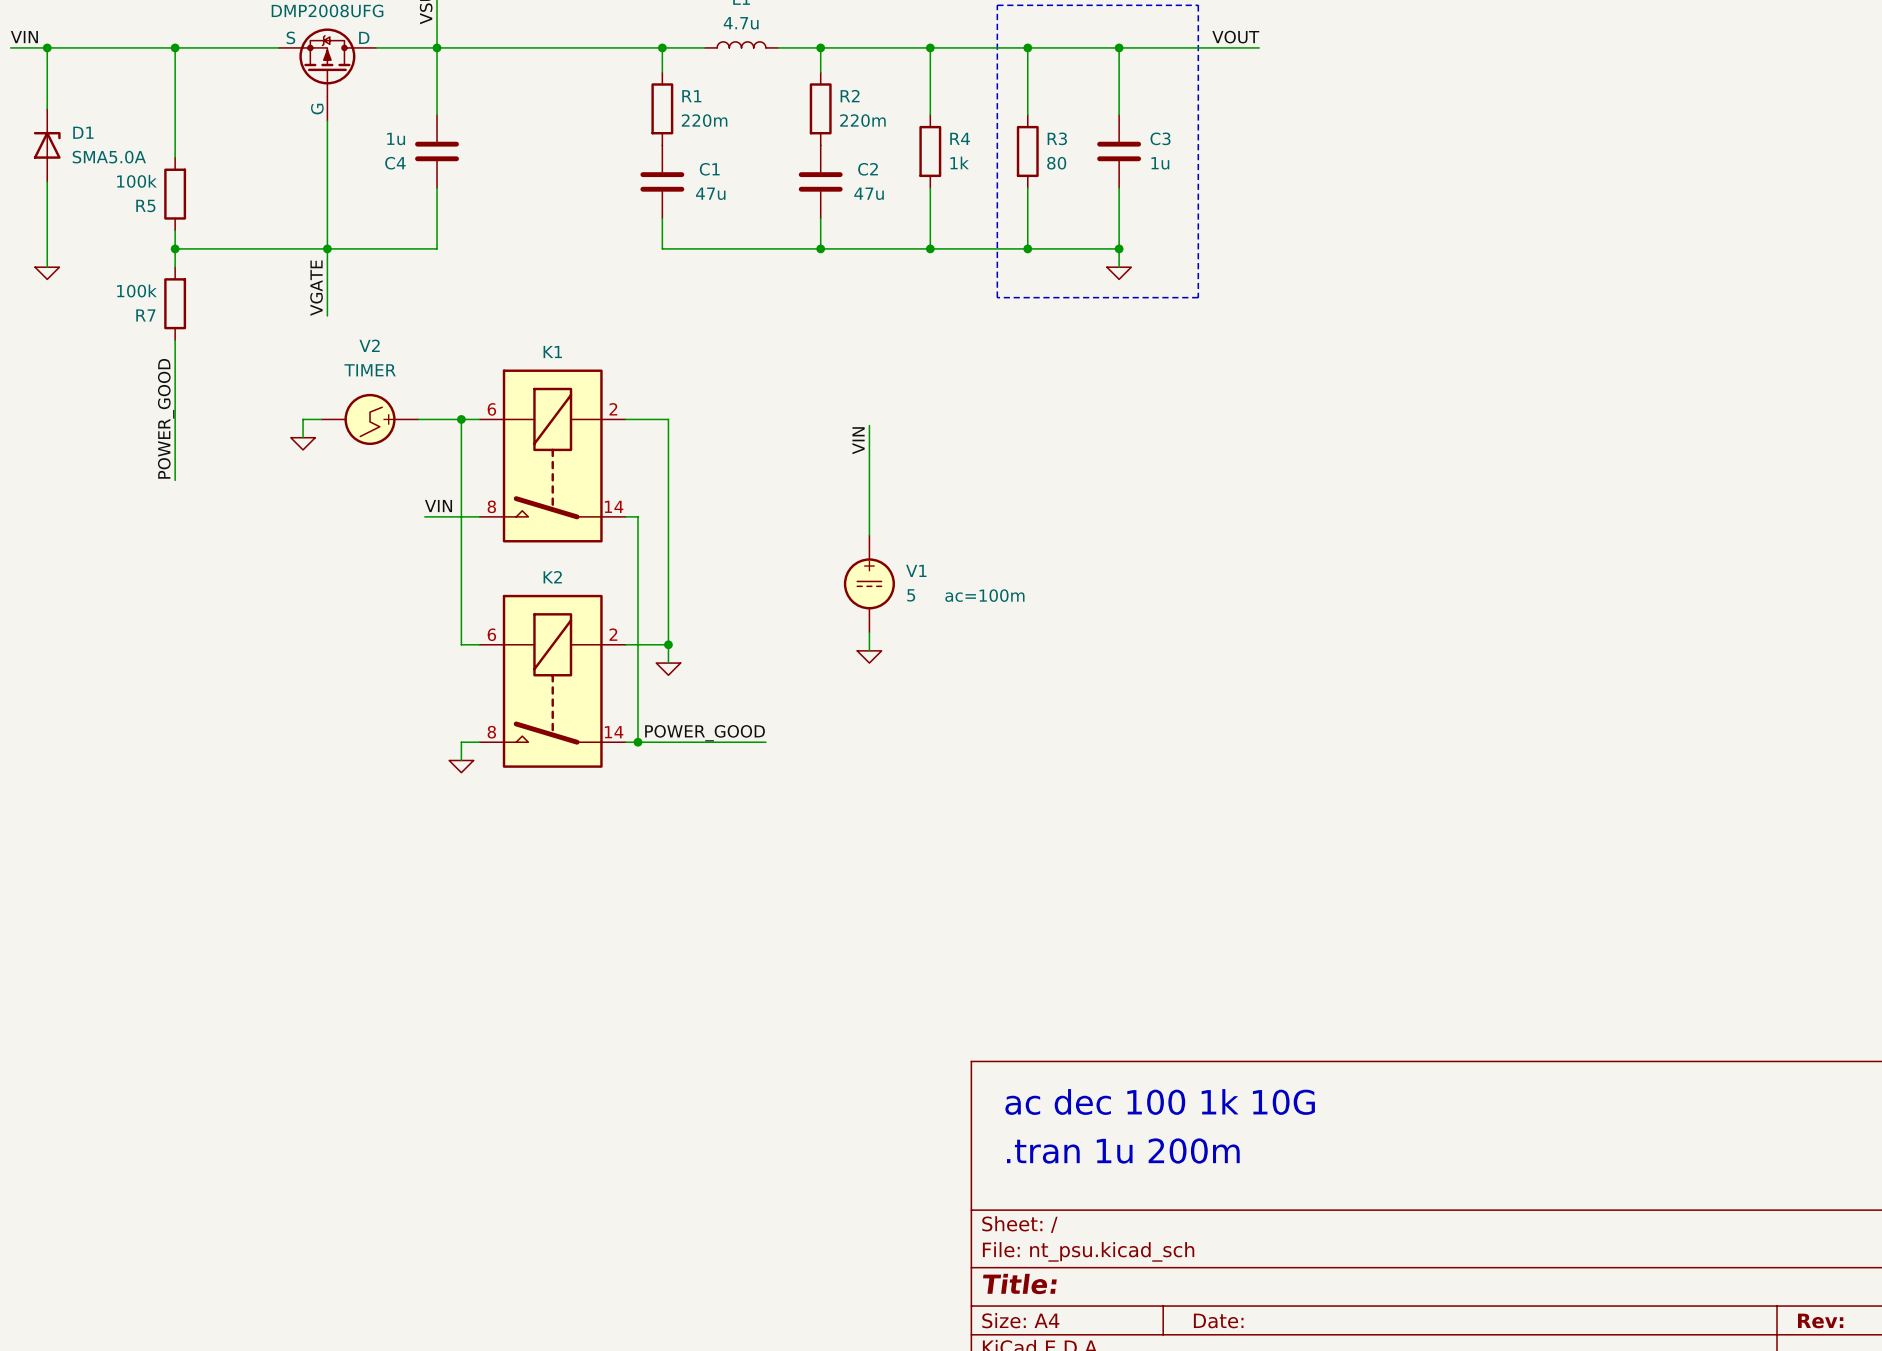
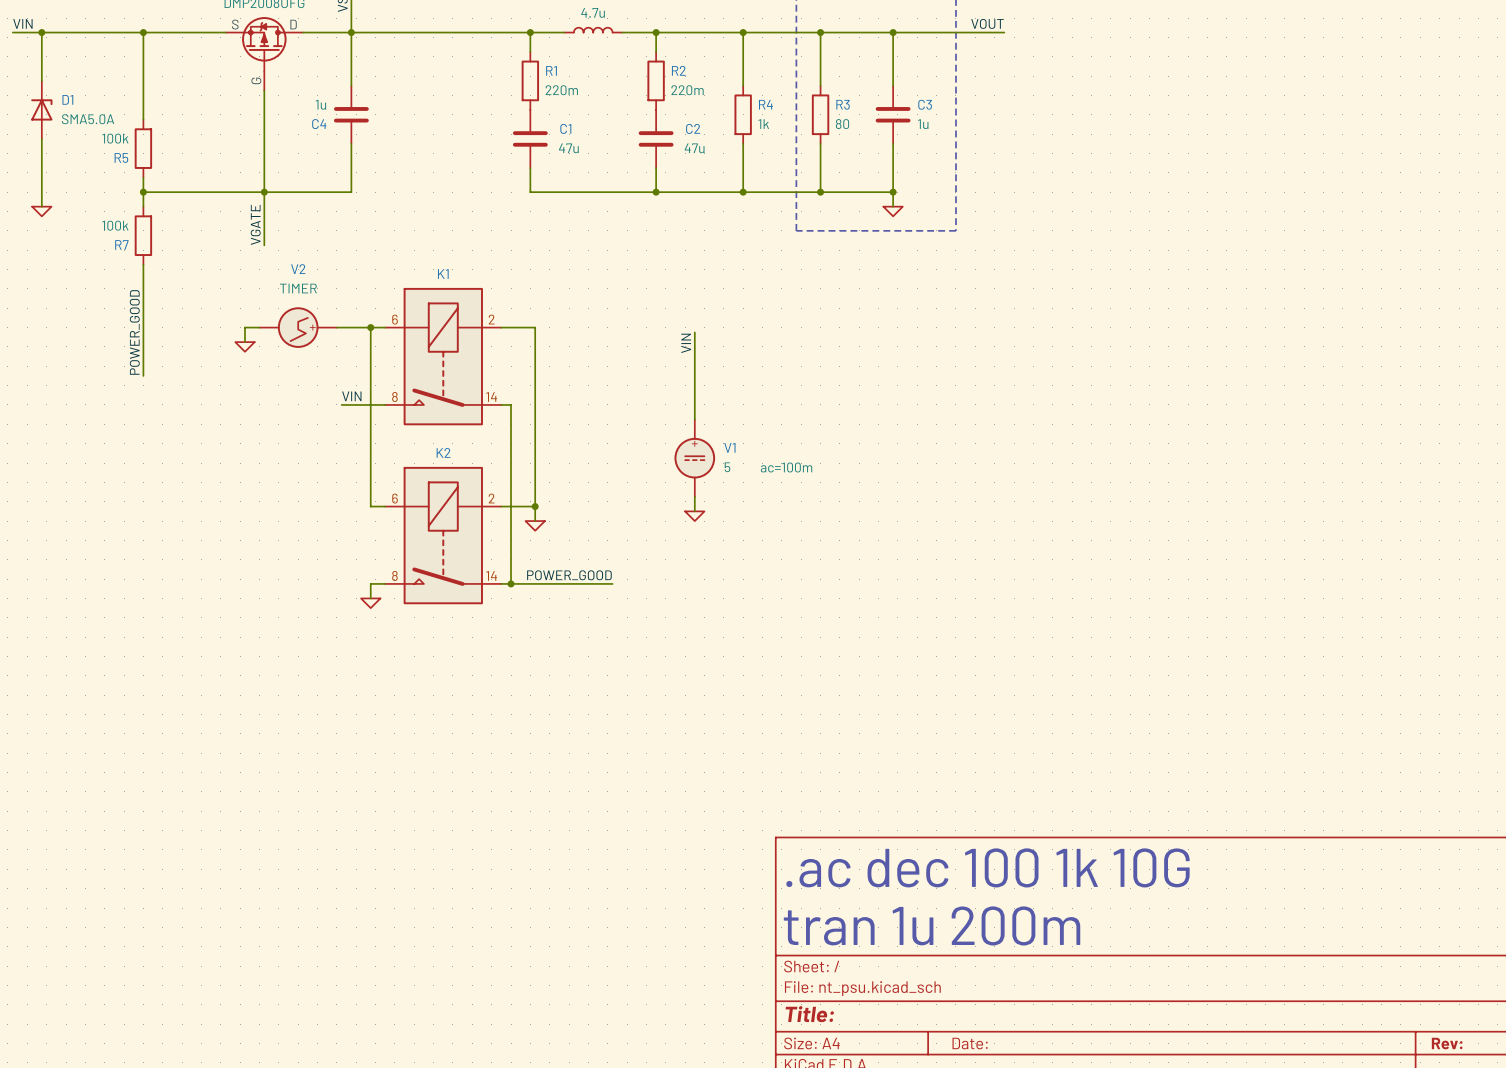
text: ac dec 100 1k 10G (1160, 1101) -> .ac dec 100 1k 10G (987, 867)
text: .tran 1u 200m (1123, 1151) -> tran 1u 200m (932, 925)

